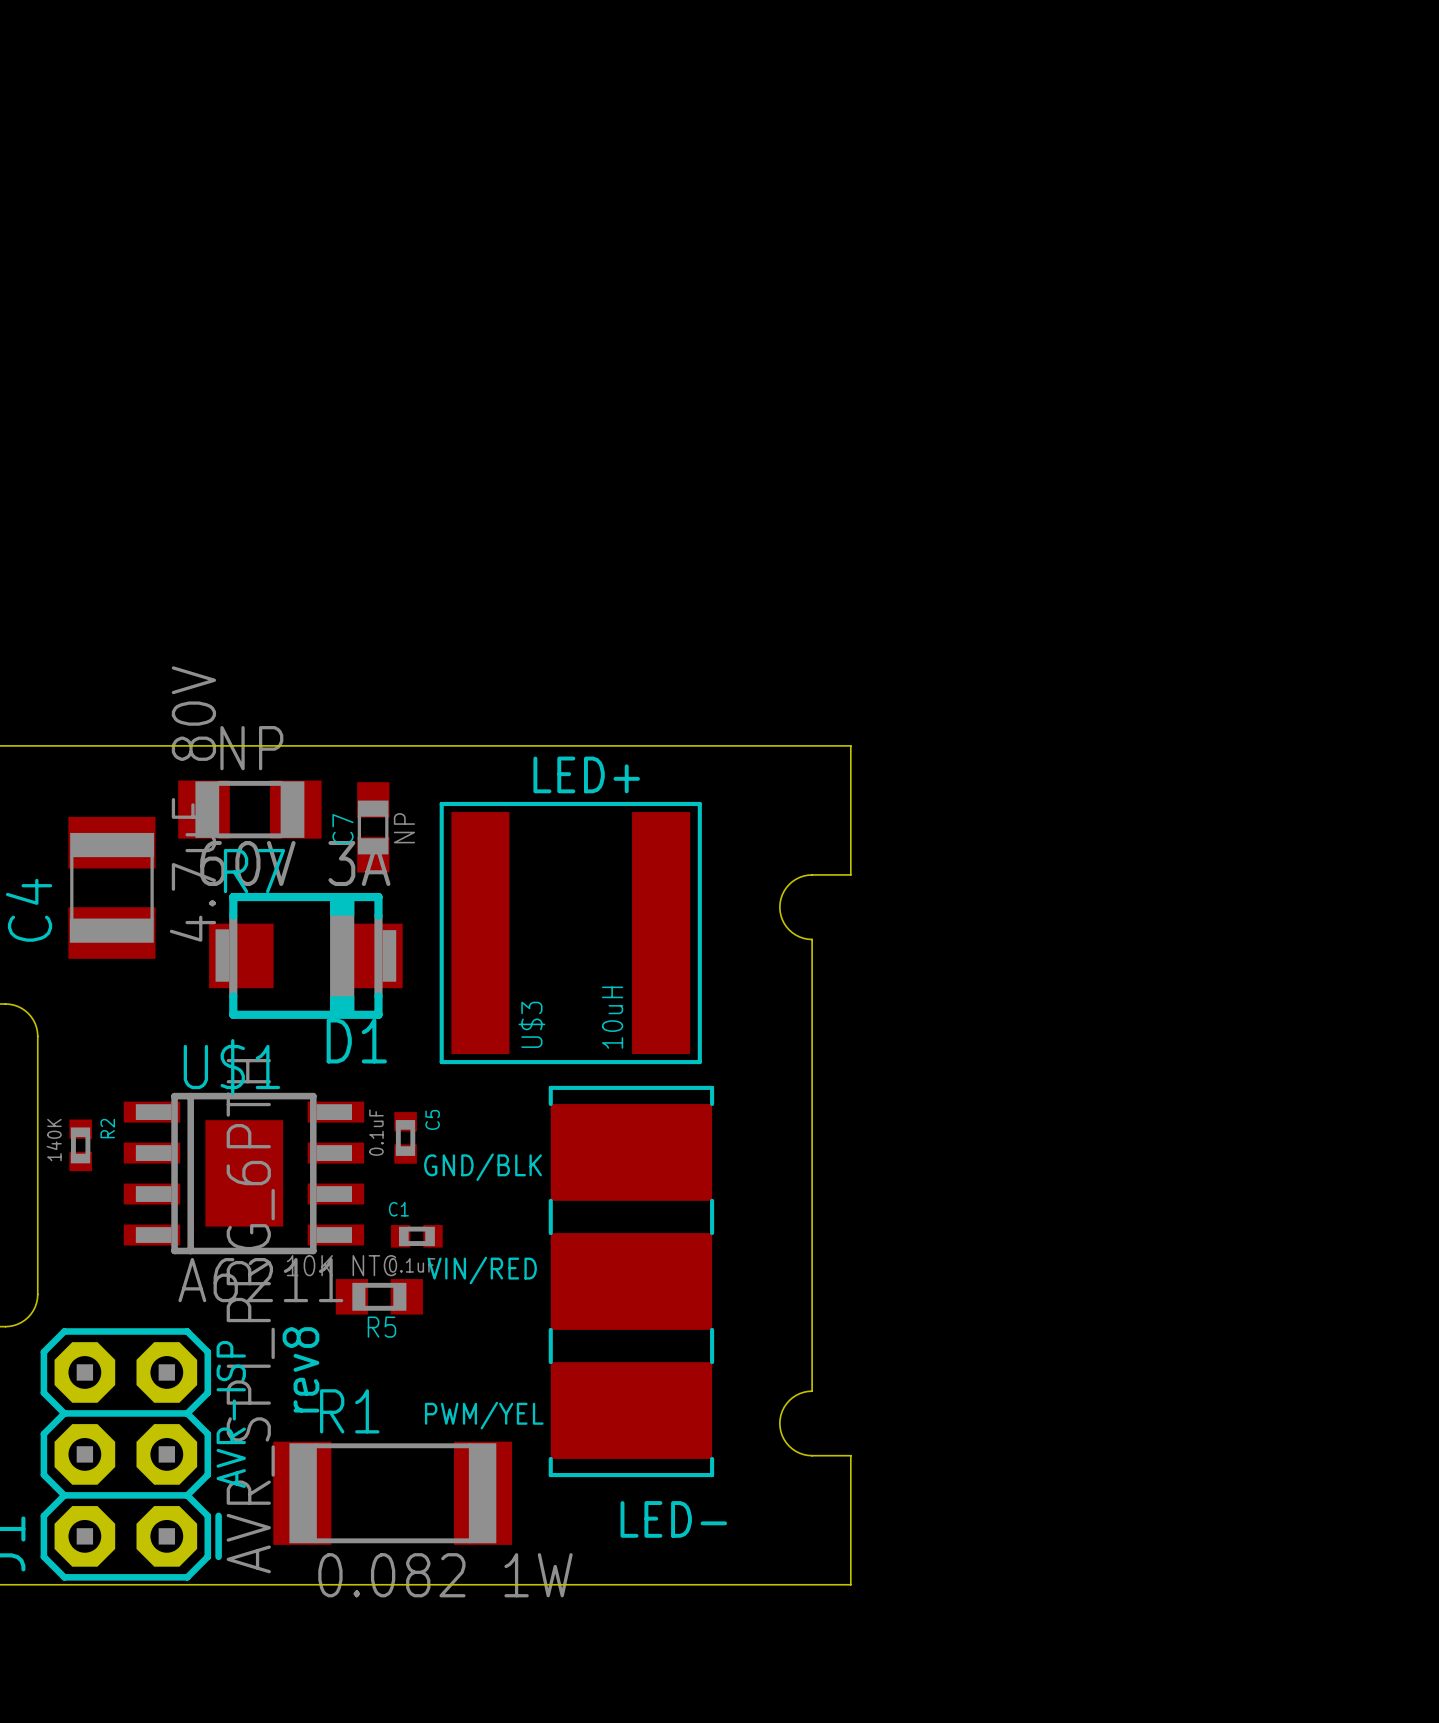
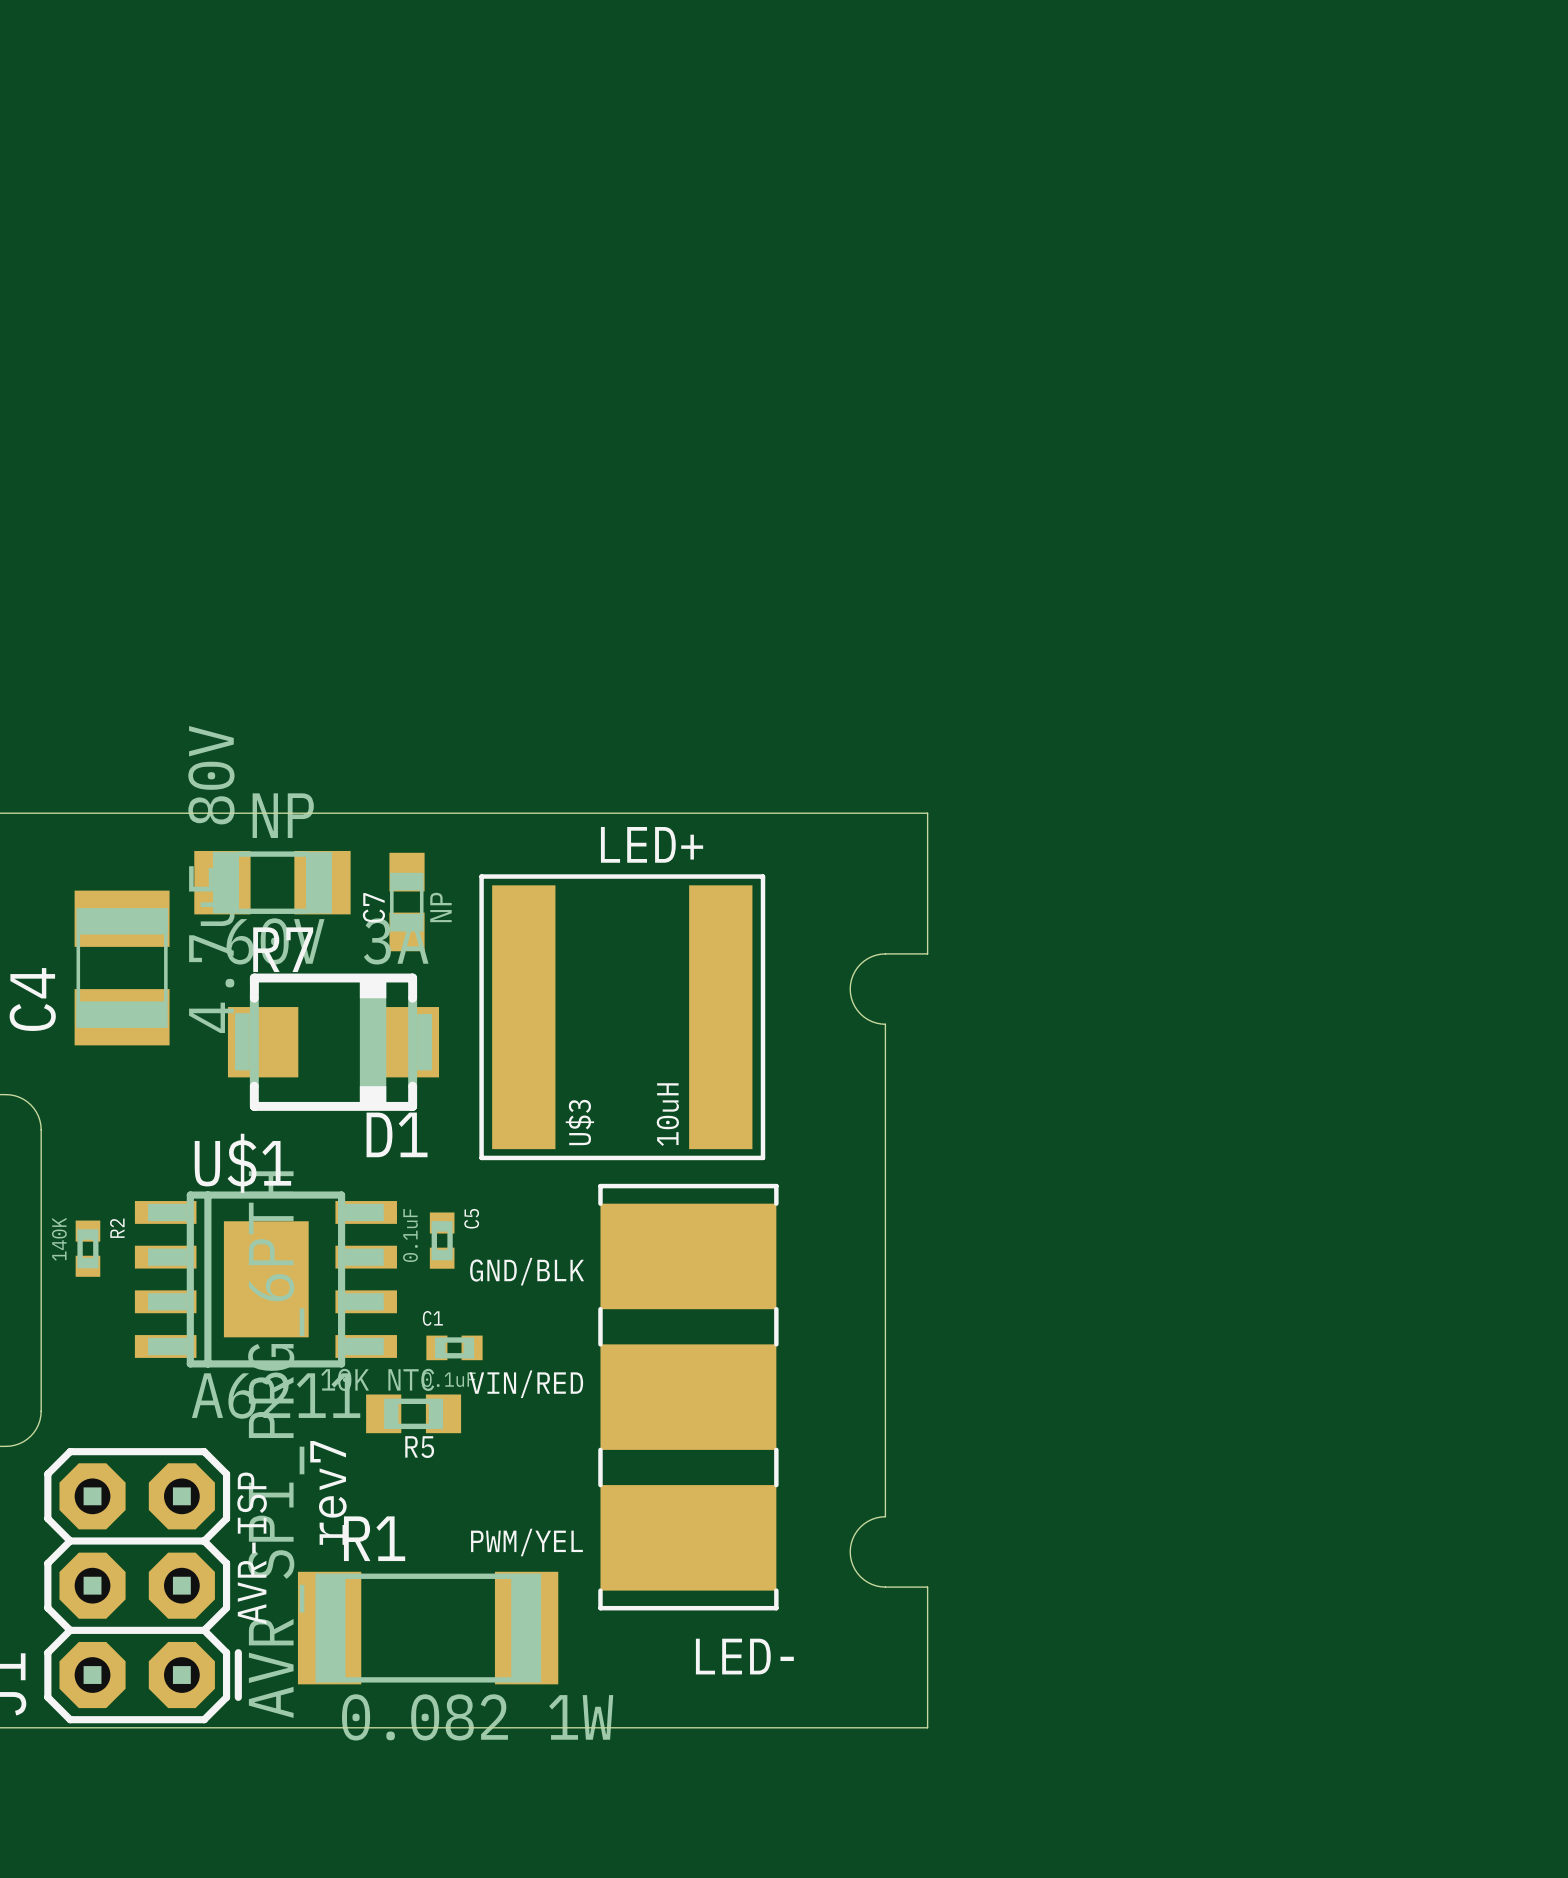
text: rev8 (300, 1369) -> rev7 (328, 1492)

